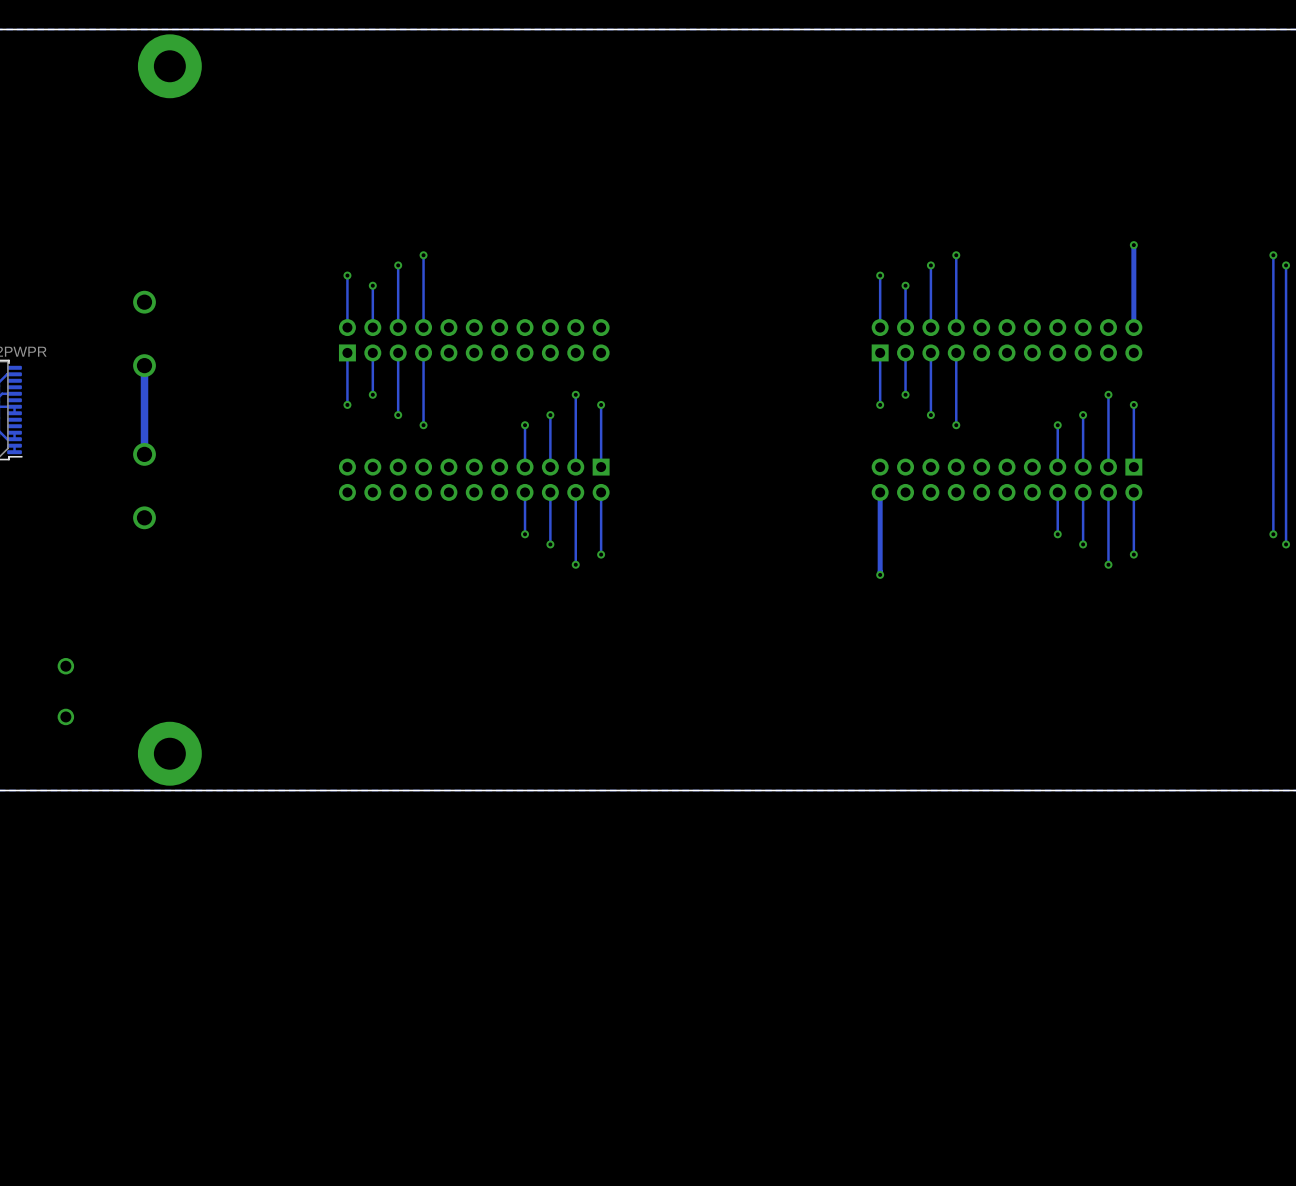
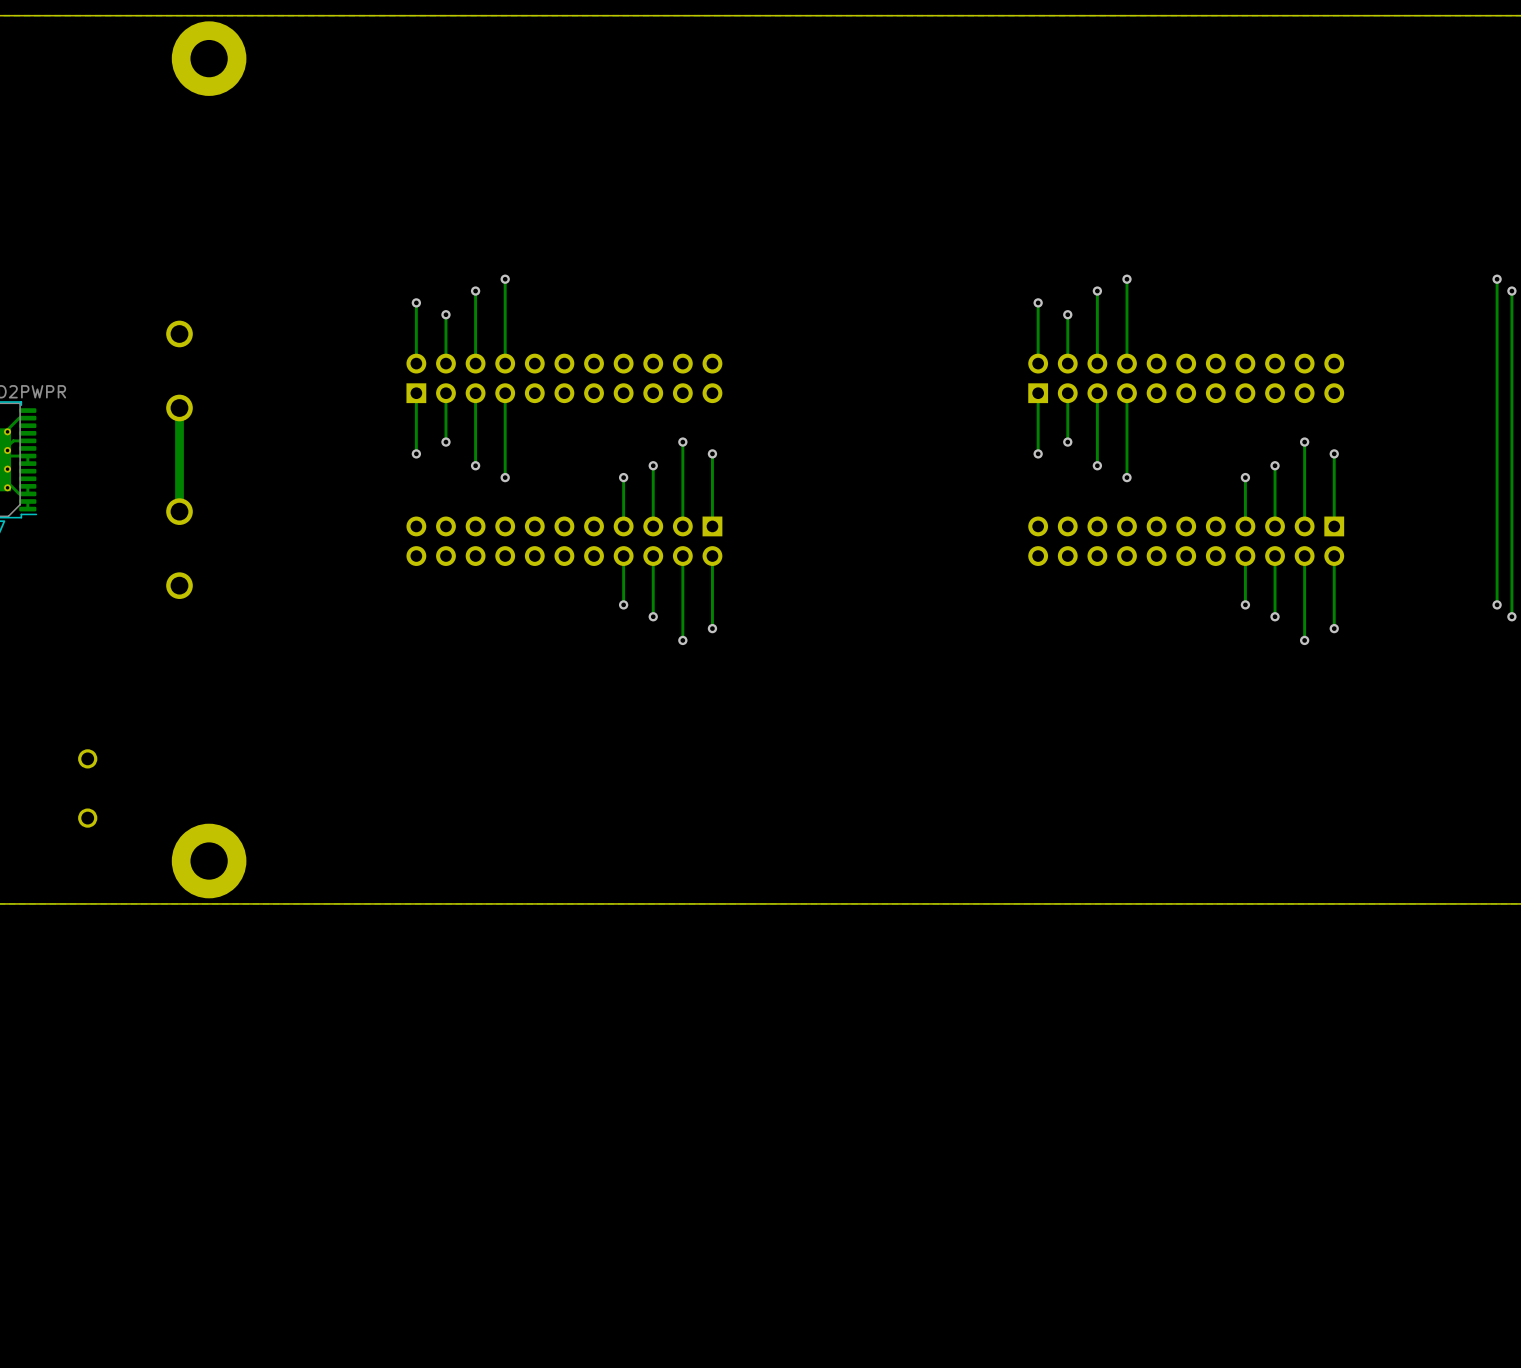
track: (1133, 245) (1133, 327) -> none
via: (1133, 245) -> none
track: (880, 492) (880, 574) -> none
via: (880, 574) -> none

